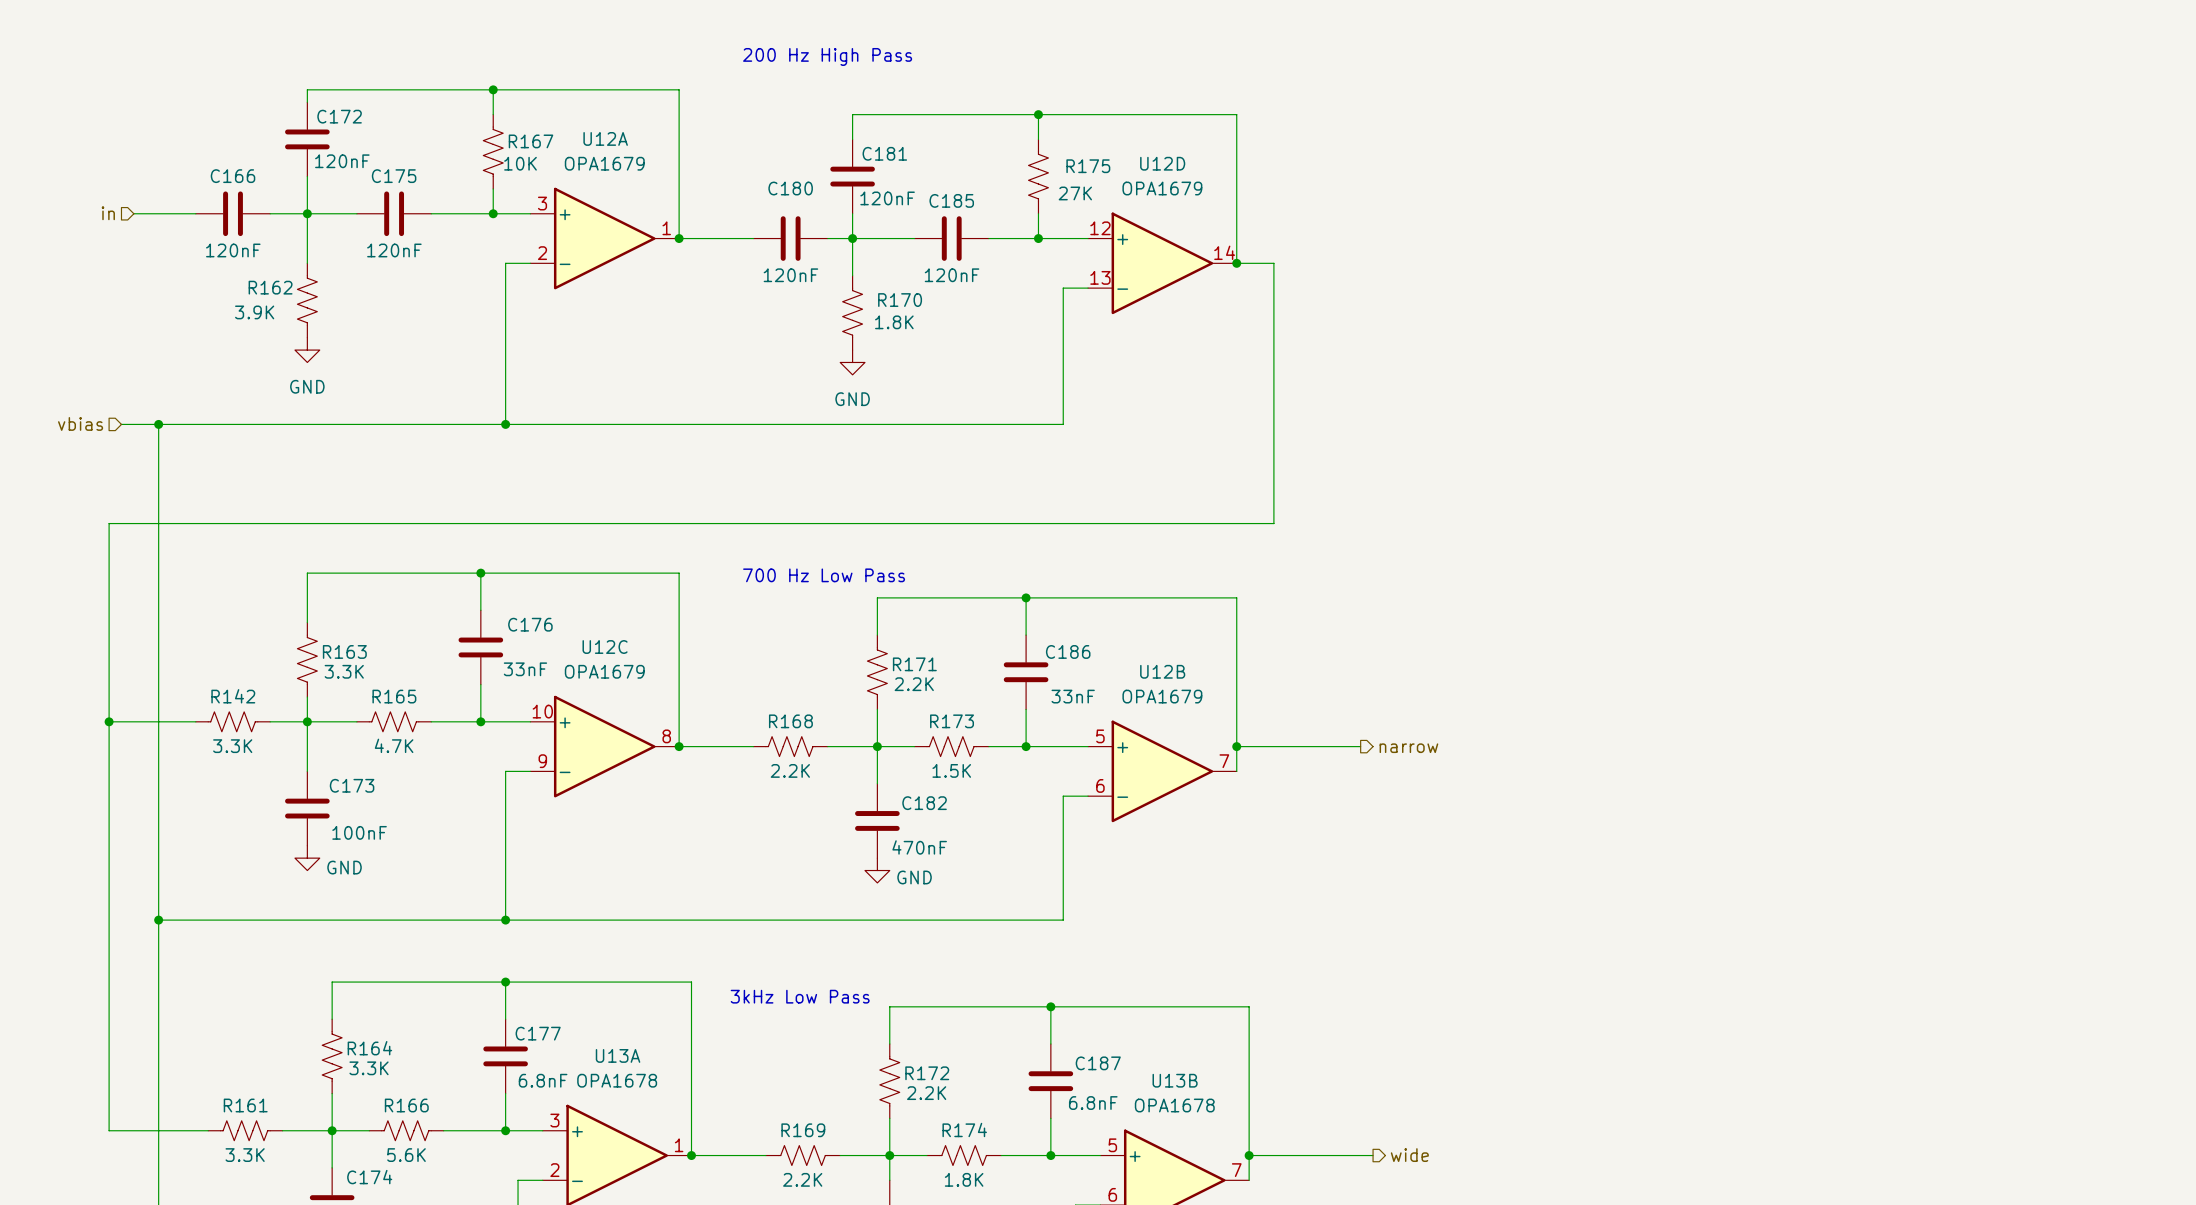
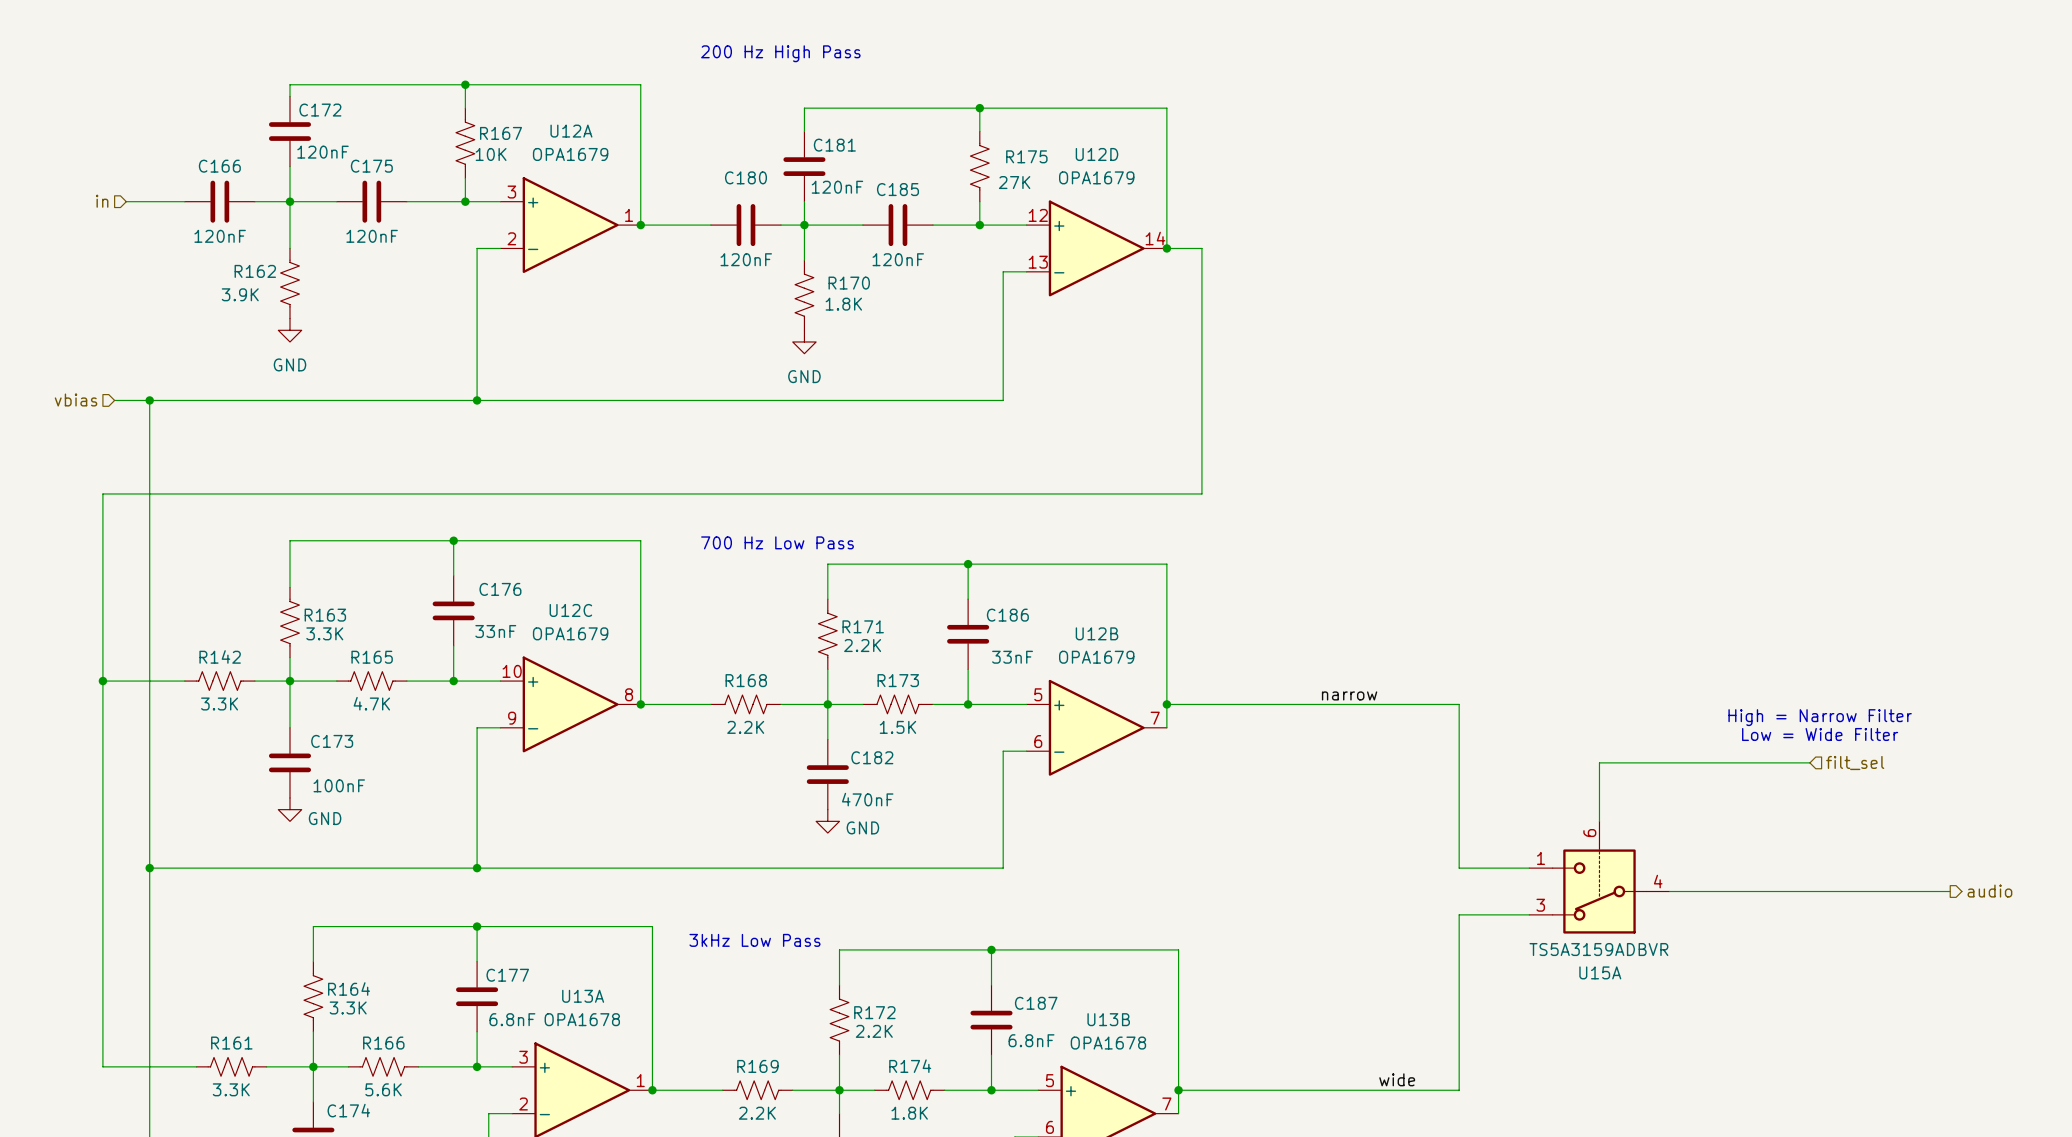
label: none -> narrow (1349, 695)
wire: none -> (1283, 704) (1459, 704) (1459, 868) (1529, 868)
hierarchical label: narrow (1408, 748) -> none
text: none -> High = Narrow Filter (1820, 717)
text: none -> Low = Wide Filter (1820, 734)
wire: none -> (1809, 762) (1599, 762) (1599, 821)
hierarchical label: none -> filt_sel (1855, 763)
U15A: none -> TS5A3159ADBVR (1599, 877)
wire: none -> (1669, 891) (1950, 891)
hierarchical label: none -> audio (1989, 891)
wire: none -> (1529, 914) (1459, 914) (1459, 1090) (1295, 1090)
label: none -> wide (1397, 1079)
hierarchical label: wide (1409, 1155) -> none

